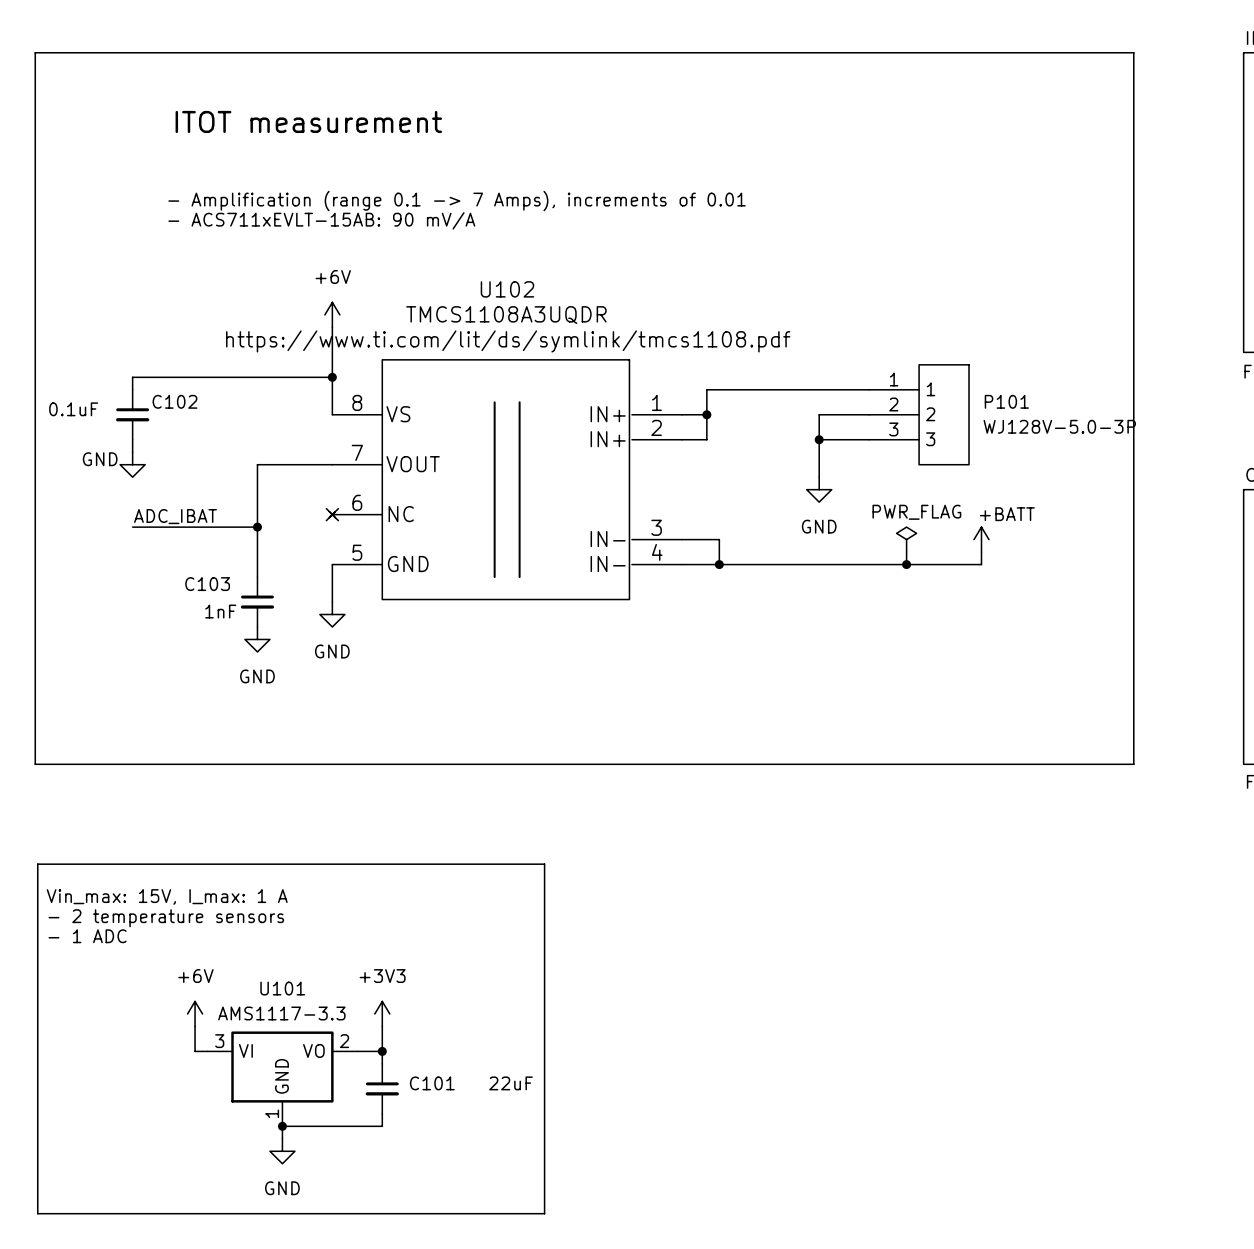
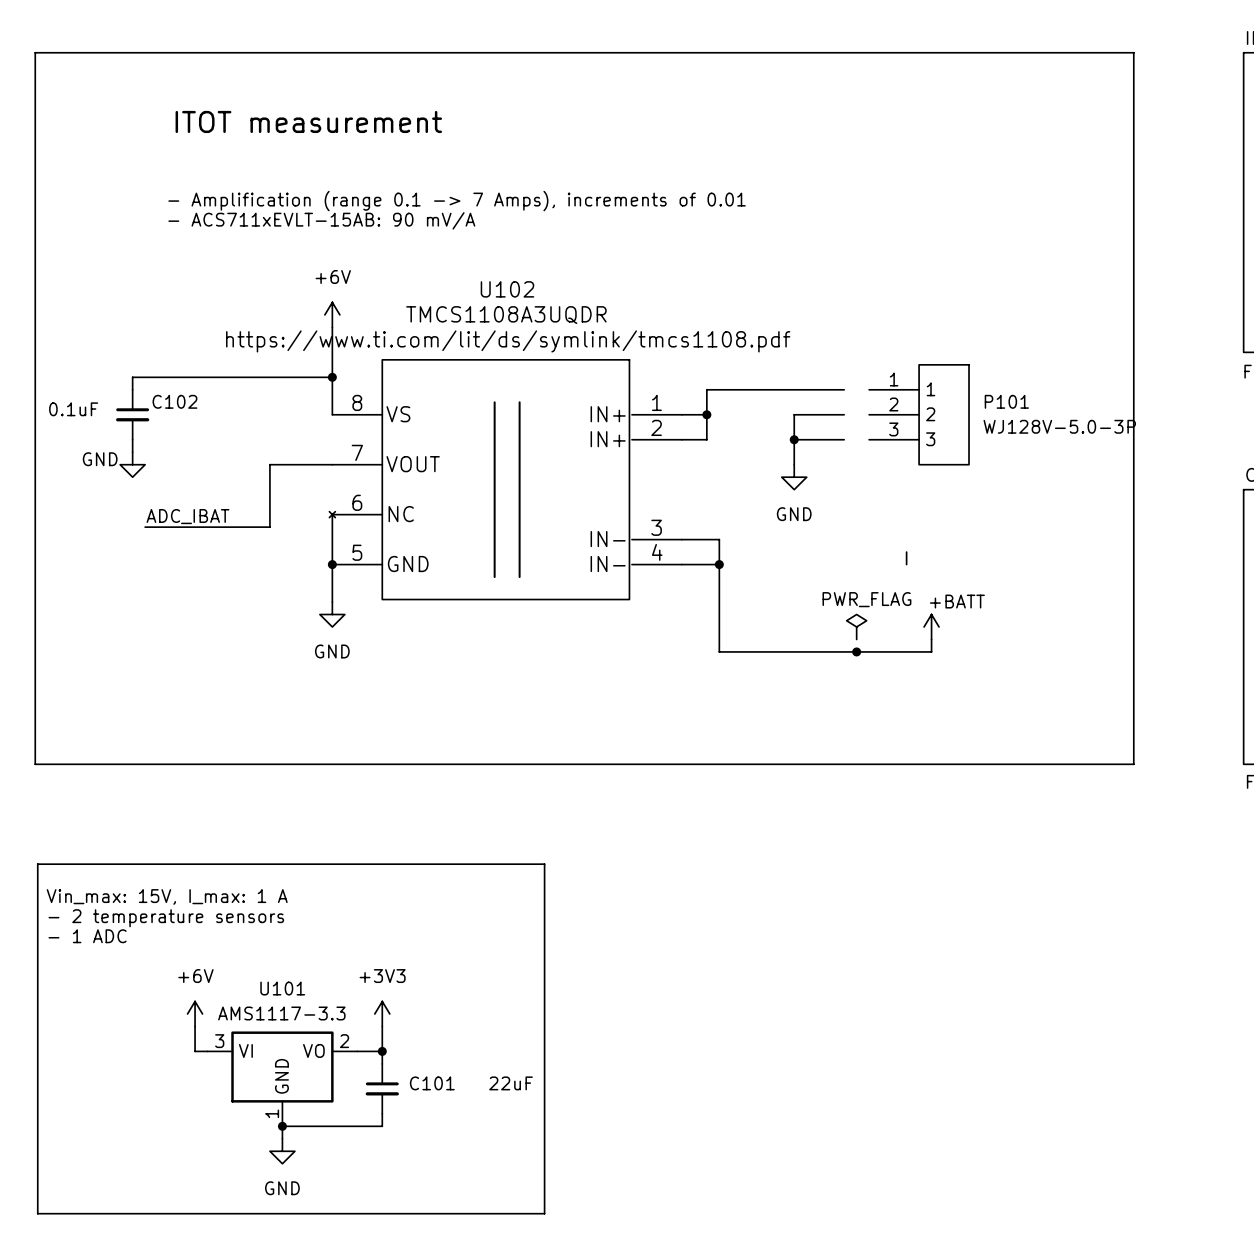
wire: (844, 389) (869, 389) -> none
wire: (819, 414) (819, 477) -> (819, 414) (794, 414) (794, 464)
wire: (844, 414) (869, 414) -> none
junction position: (819, 439) -> (794, 439)
wire: (844, 439) (869, 439) -> (794, 439) (819, 439)
wire: (269, 464) (257, 464) (257, 577) -> (269, 464) (269, 527) (257, 527)
power symbol position: GND (819, 489) -> GND (794, 477)
wire: none -> (332, 514) (332, 564)
no-connect mark: (332, 514) -> none
label position: ADC_IBAT (175, 516) -> ADC_IBAT (188, 516)
wire: (132, 527) (145, 527) -> none
junction: (257, 527) -> none
power symbol position: PWR_FLAG (906, 539) -> PWR_FLAG (856, 626)
power symbol position: +BATT (981, 539) -> +BATT (931, 626)
wire: (981, 552) (981, 564) (719, 564) -> (931, 639) (931, 651) (719, 651) (719, 564)
junction: none -> (332, 564)
junction: (906, 564) -> none
C103: 1nF (257, 602) -> none
power symbol: GND (257, 639) -> none
junction: none -> (856, 651)

